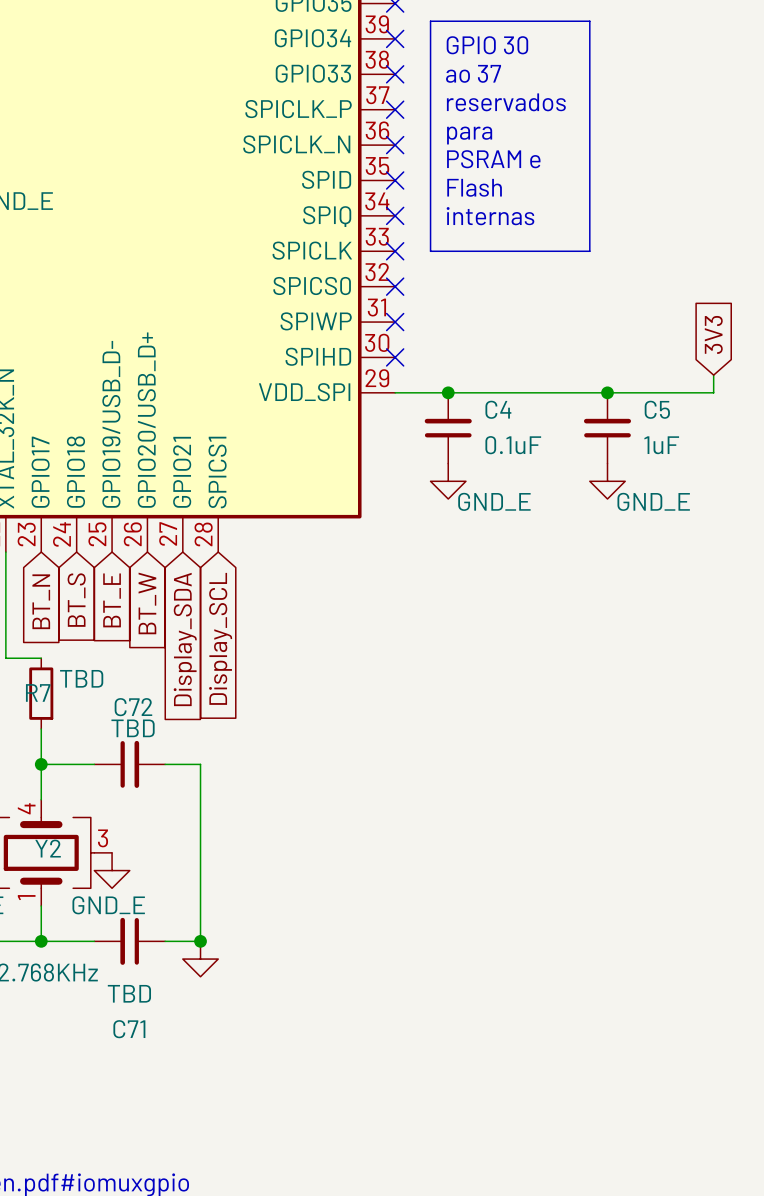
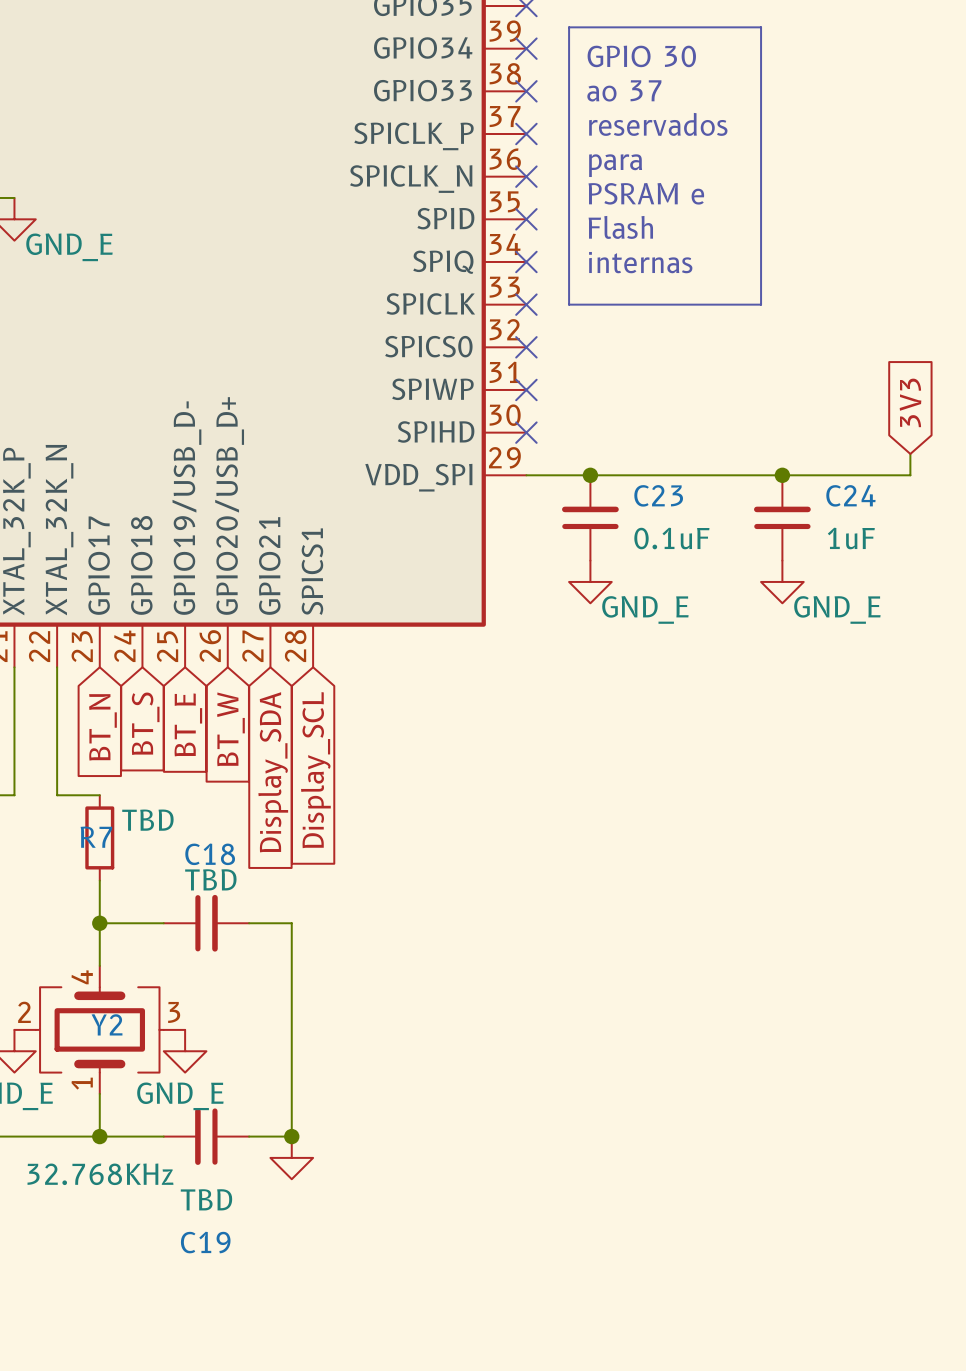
C4 name: C4 (498, 409) -> C23 (658, 495)
C5 name: C5 (657, 409) -> C24 (850, 495)
C72 name: C72 (133, 707) -> C18 (210, 854)
C71 name: C71 (129, 1029) -> C19 (205, 1242)

